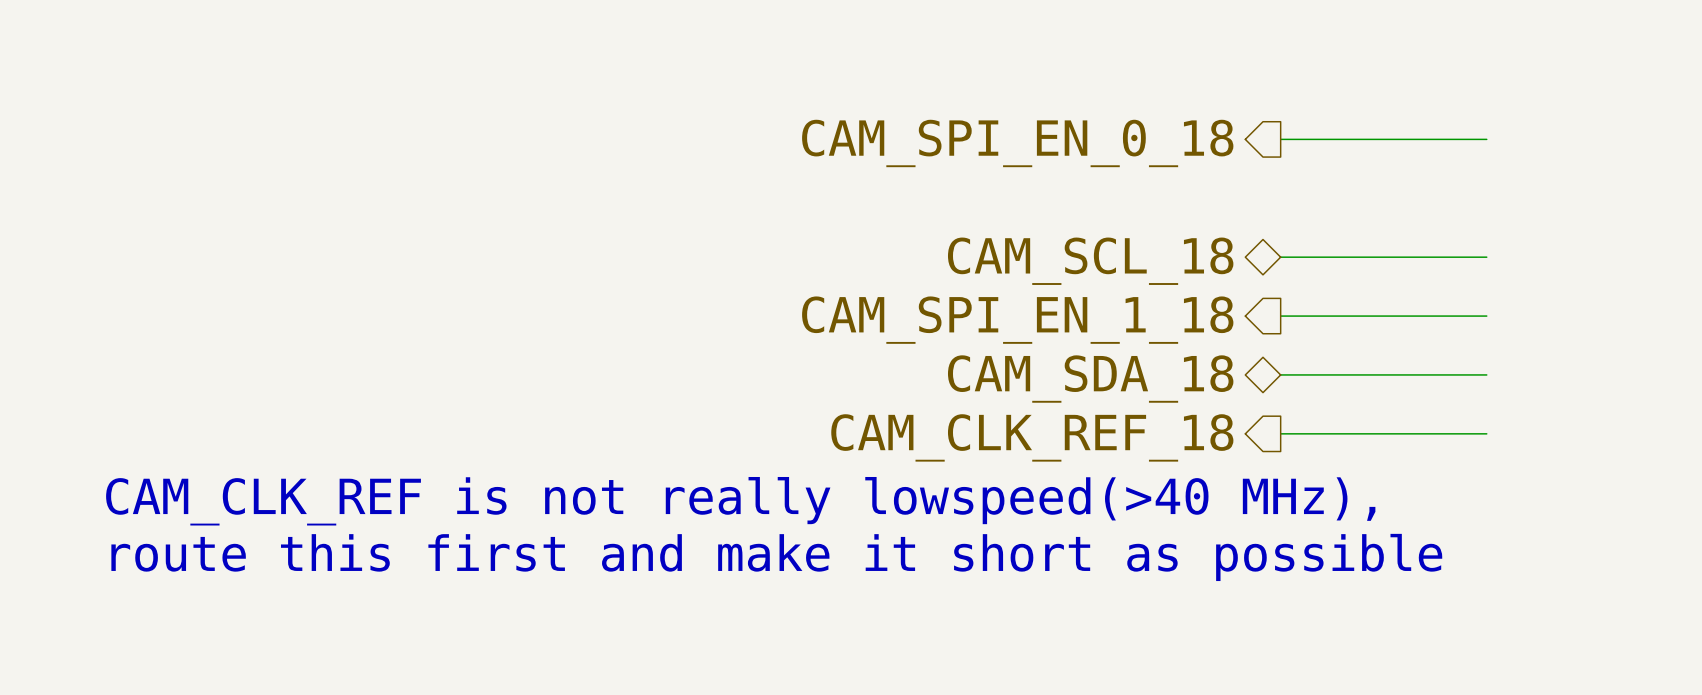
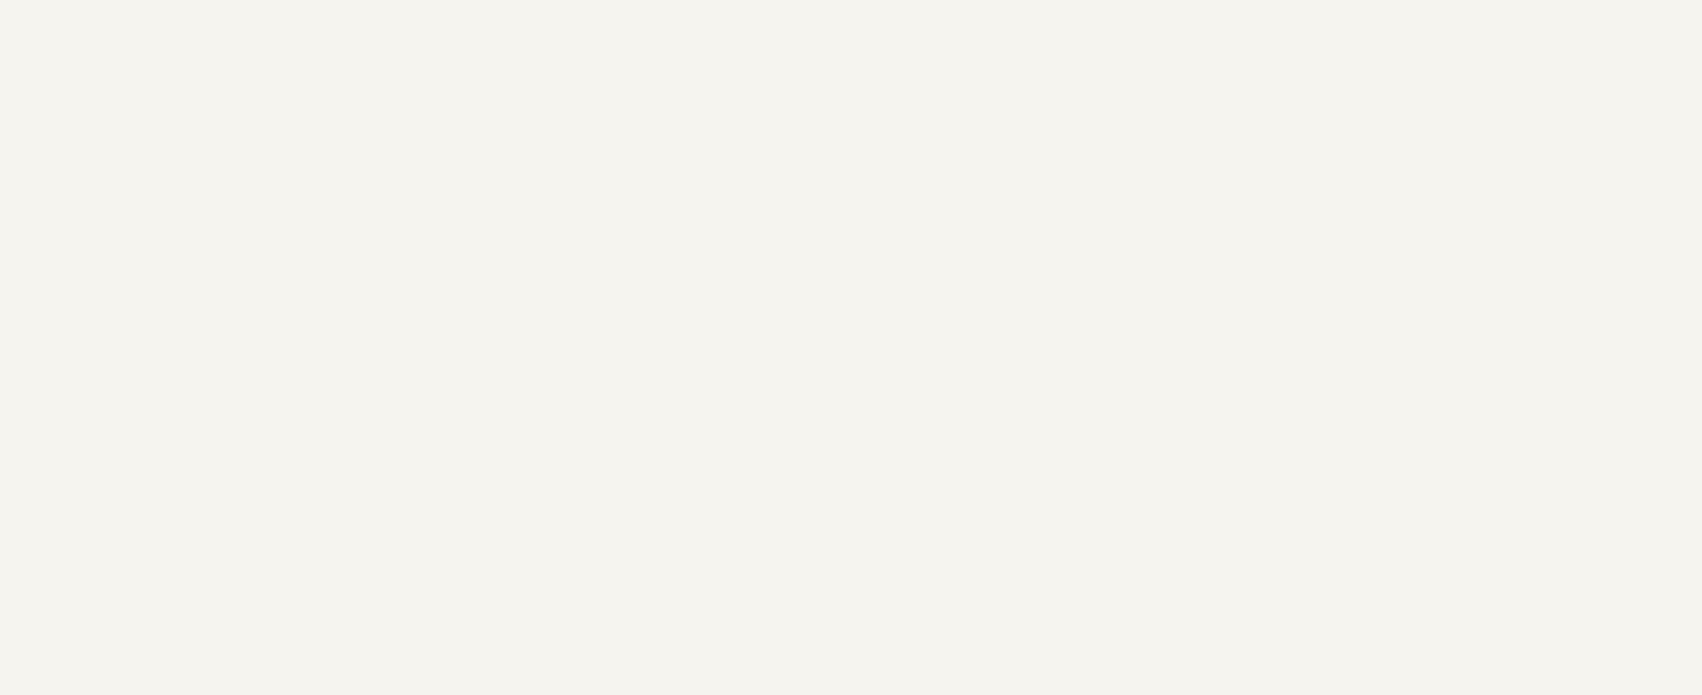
wire: (1280, 139) (1486, 139) -> none
hierarchical label: CAM_SPI_EN_0_18 (1017, 143) -> none
wire: (1280, 257) (1486, 257) -> none
hierarchical label: CAM_SCL_18 (1090, 261) -> none
wire: (1280, 316) (1486, 316) -> none
hierarchical label: CAM_SPI_EN_1_18 (1017, 320) -> none
wire: (1280, 374) (1486, 374) -> none
hierarchical label: CAM_SDA_18 (1090, 379) -> none
wire: (1280, 433) (1486, 433) -> none
hierarchical label: CAM_CLK_REF_18 (1032, 437) -> none
text: CAM_CLK_REF is not really lowspeed(>40 MHz), (740, 501) -> none
text: route this first and make it short as possible (776, 557) -> none

